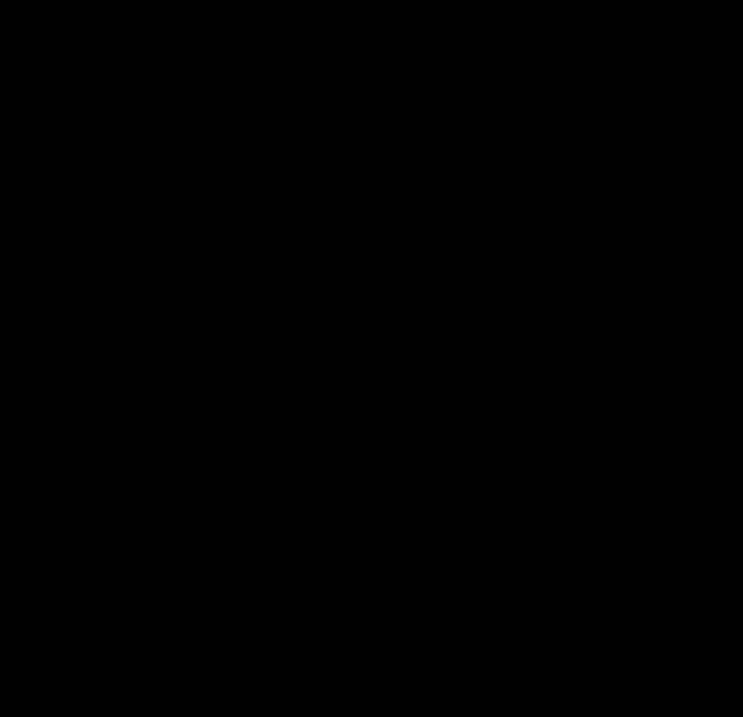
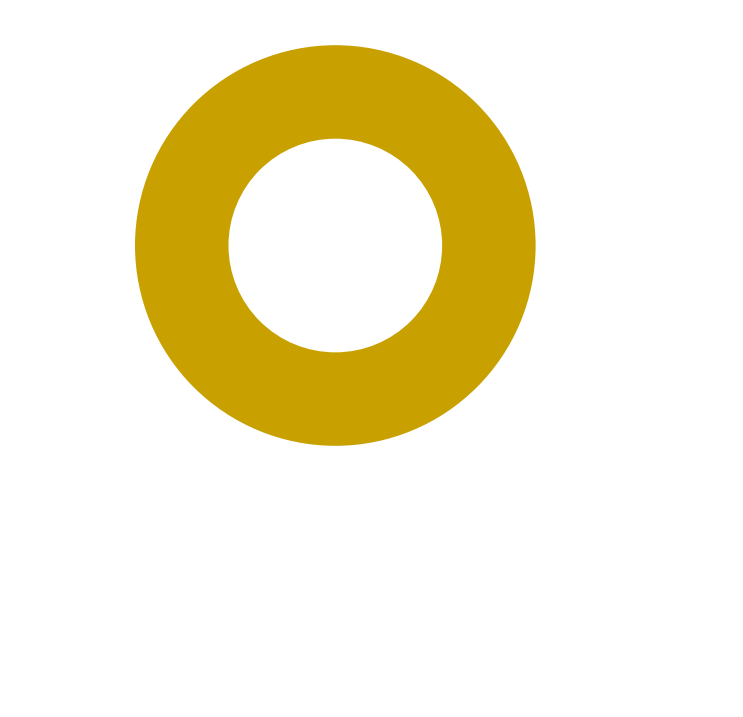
part: none -> (335, 245)

